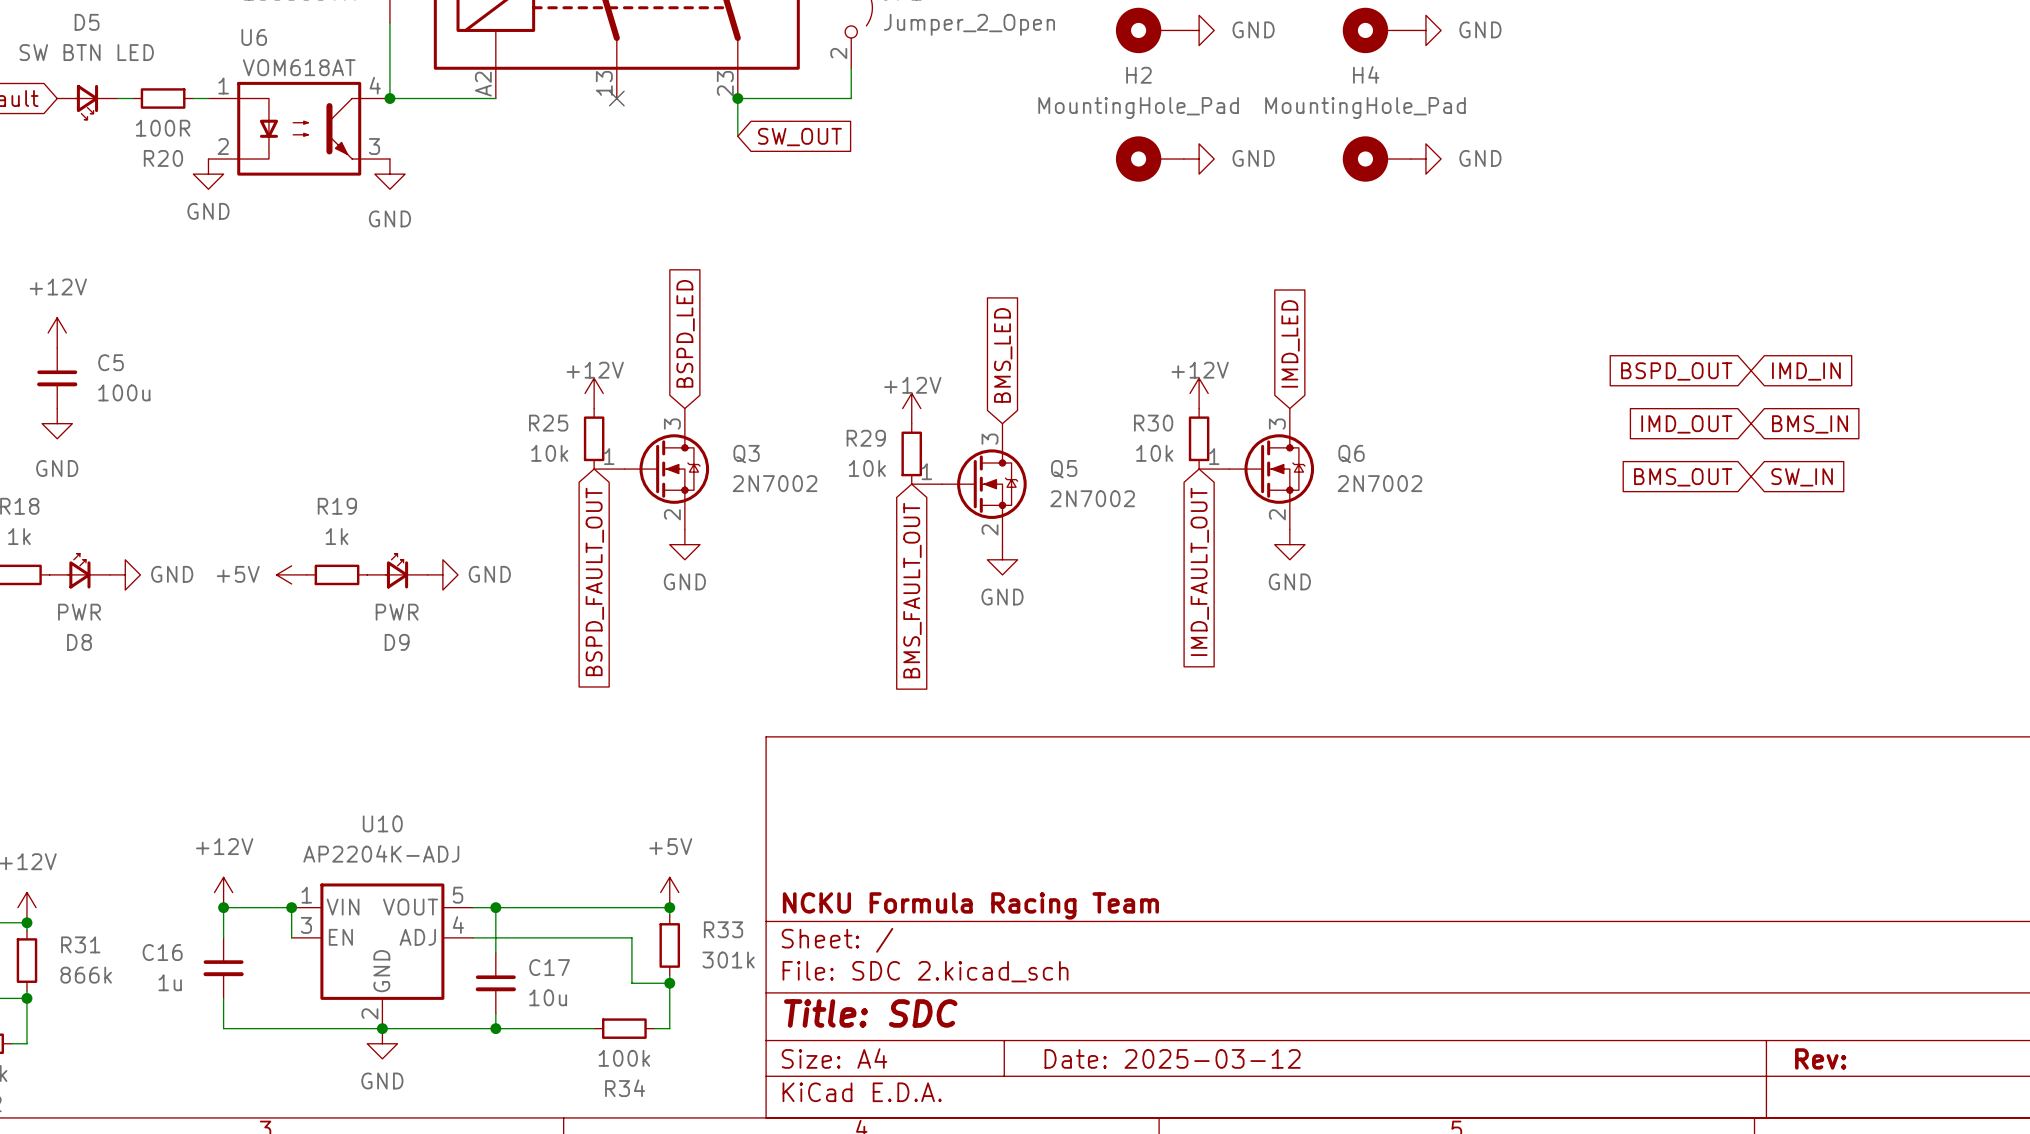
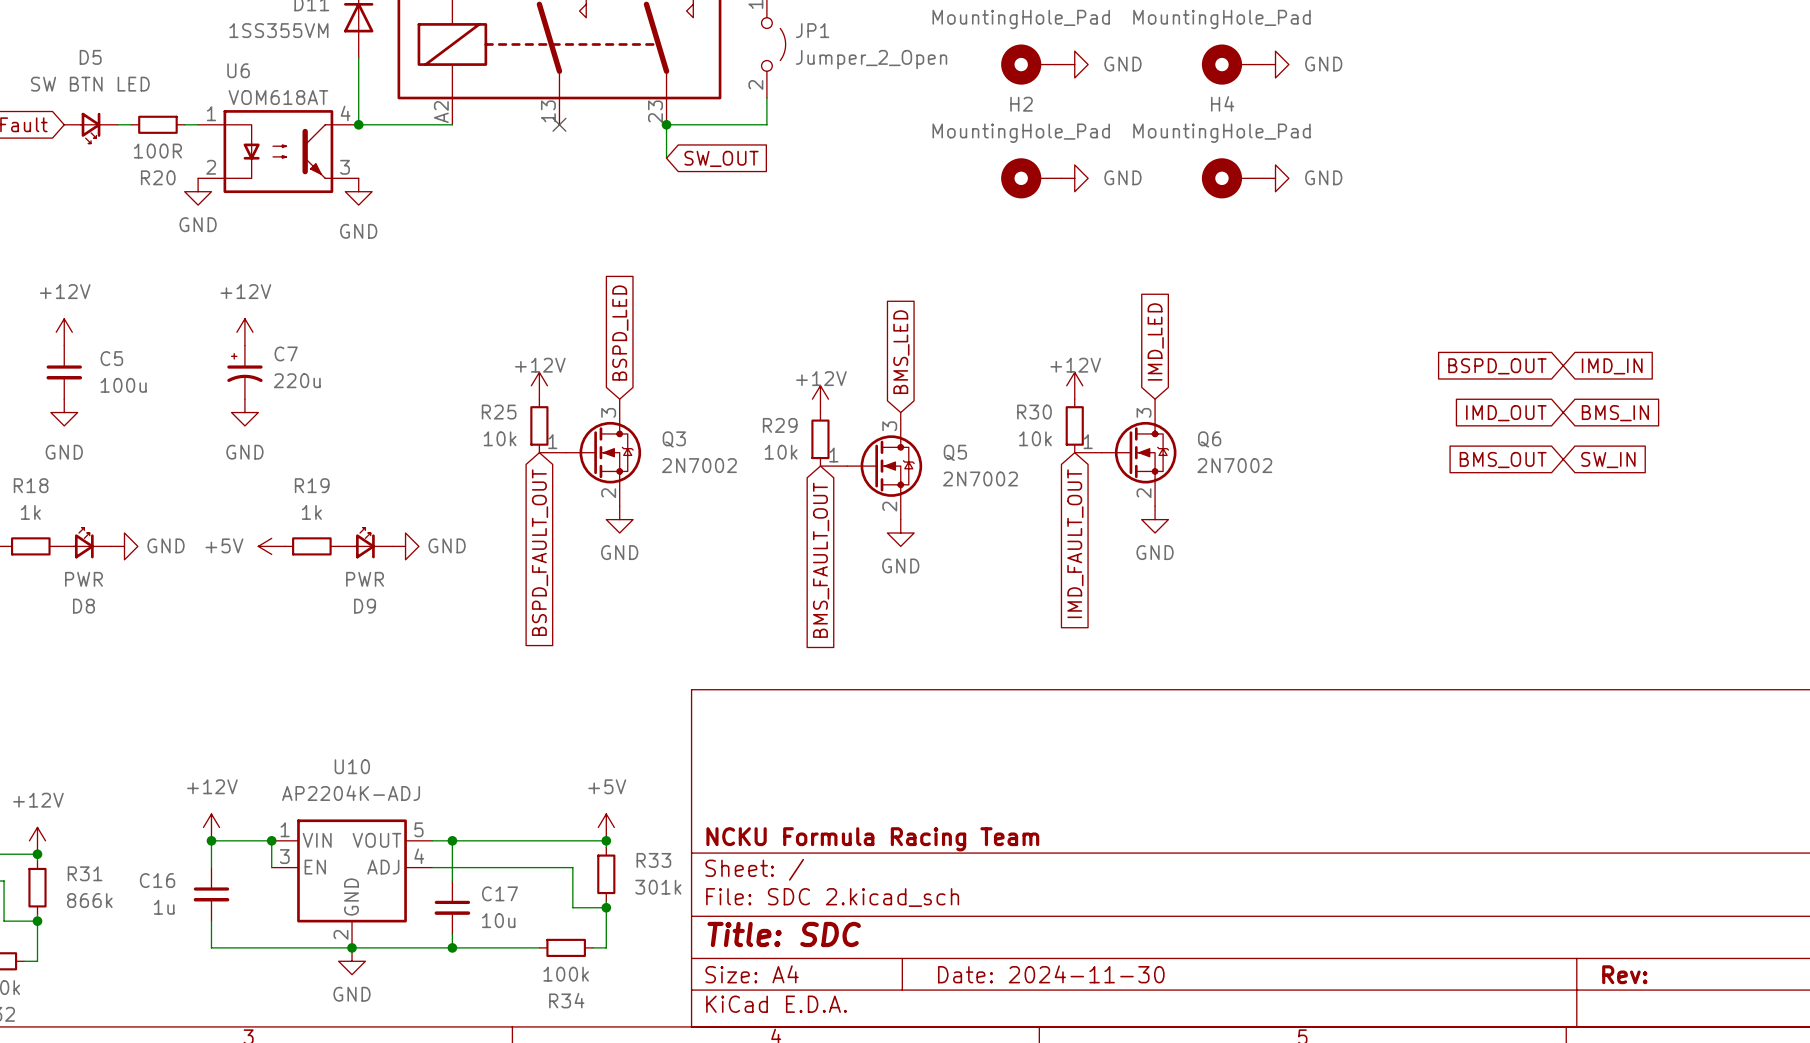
power symbol: none -> +12V (244, 332)
C7: none -> 220u (244, 372)
power symbol: none -> GND (244, 412)
title block: Date: 2025-03-12 (1172, 1058) -> Date: 2024-11-30 (1051, 974)

